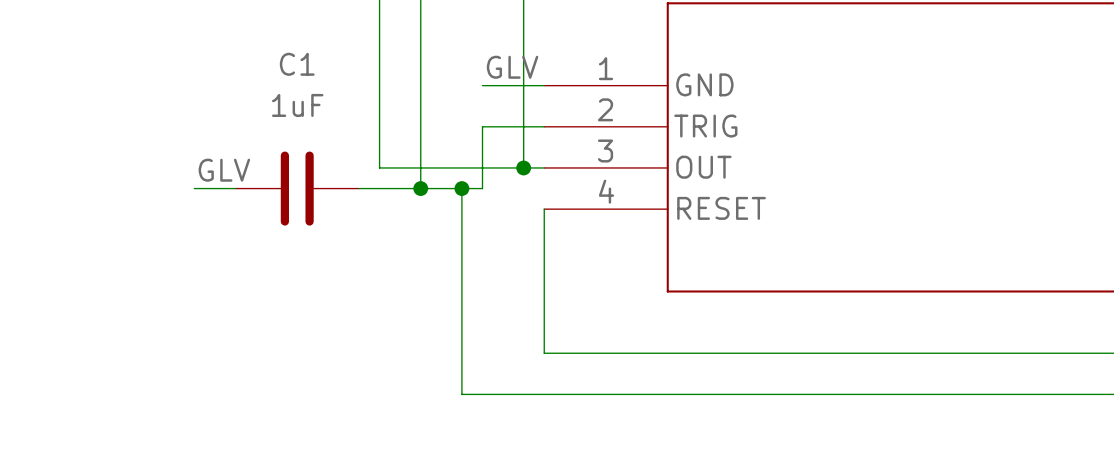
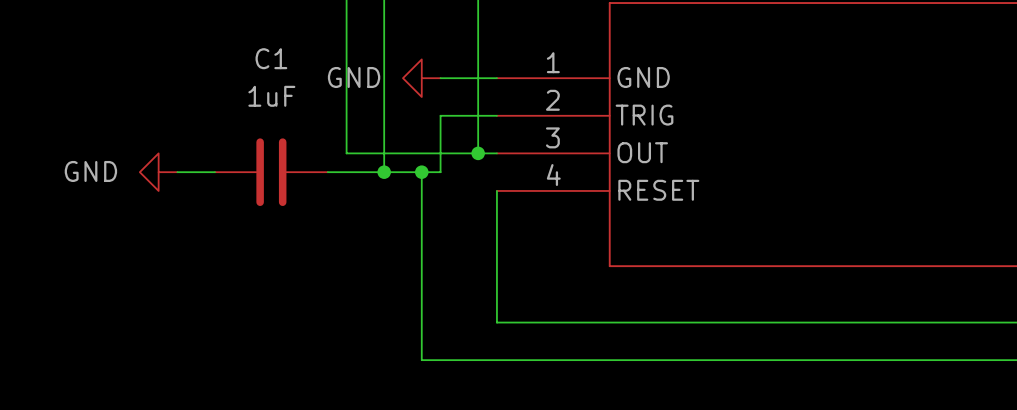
label: GLV (512, 67) -> none
power symbol: none -> GND (421, 78)
label: GLV (224, 170) -> none
power symbol: none -> GND (158, 172)

